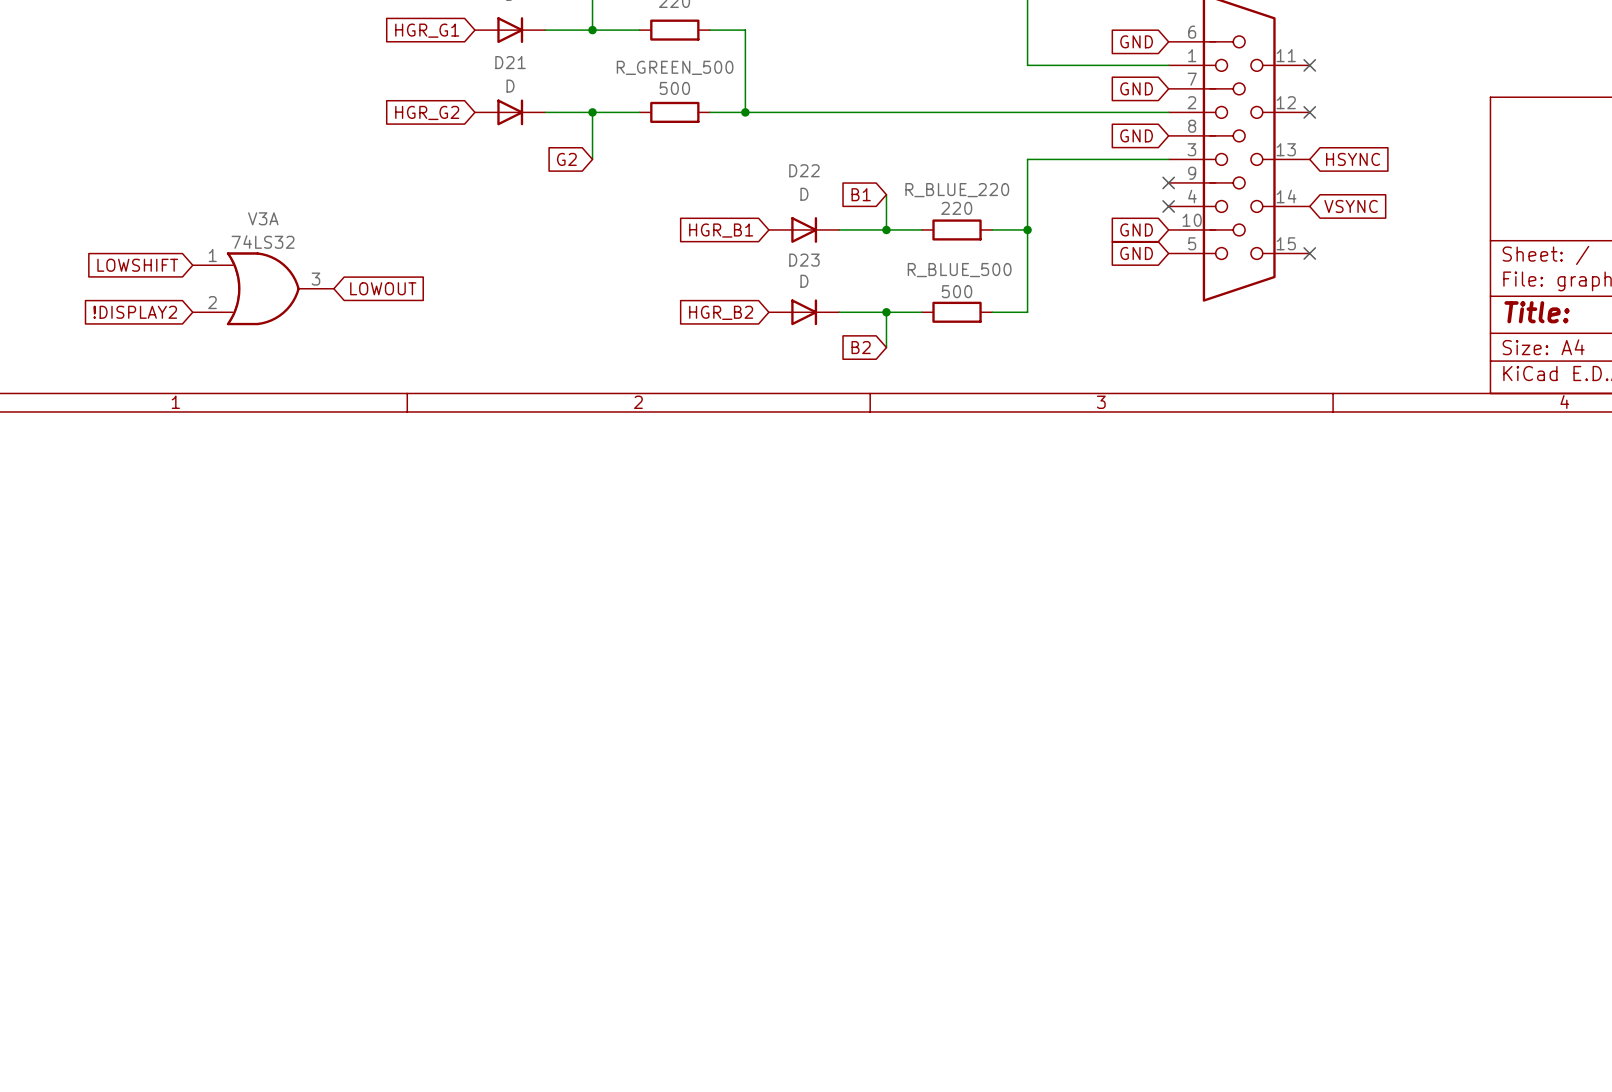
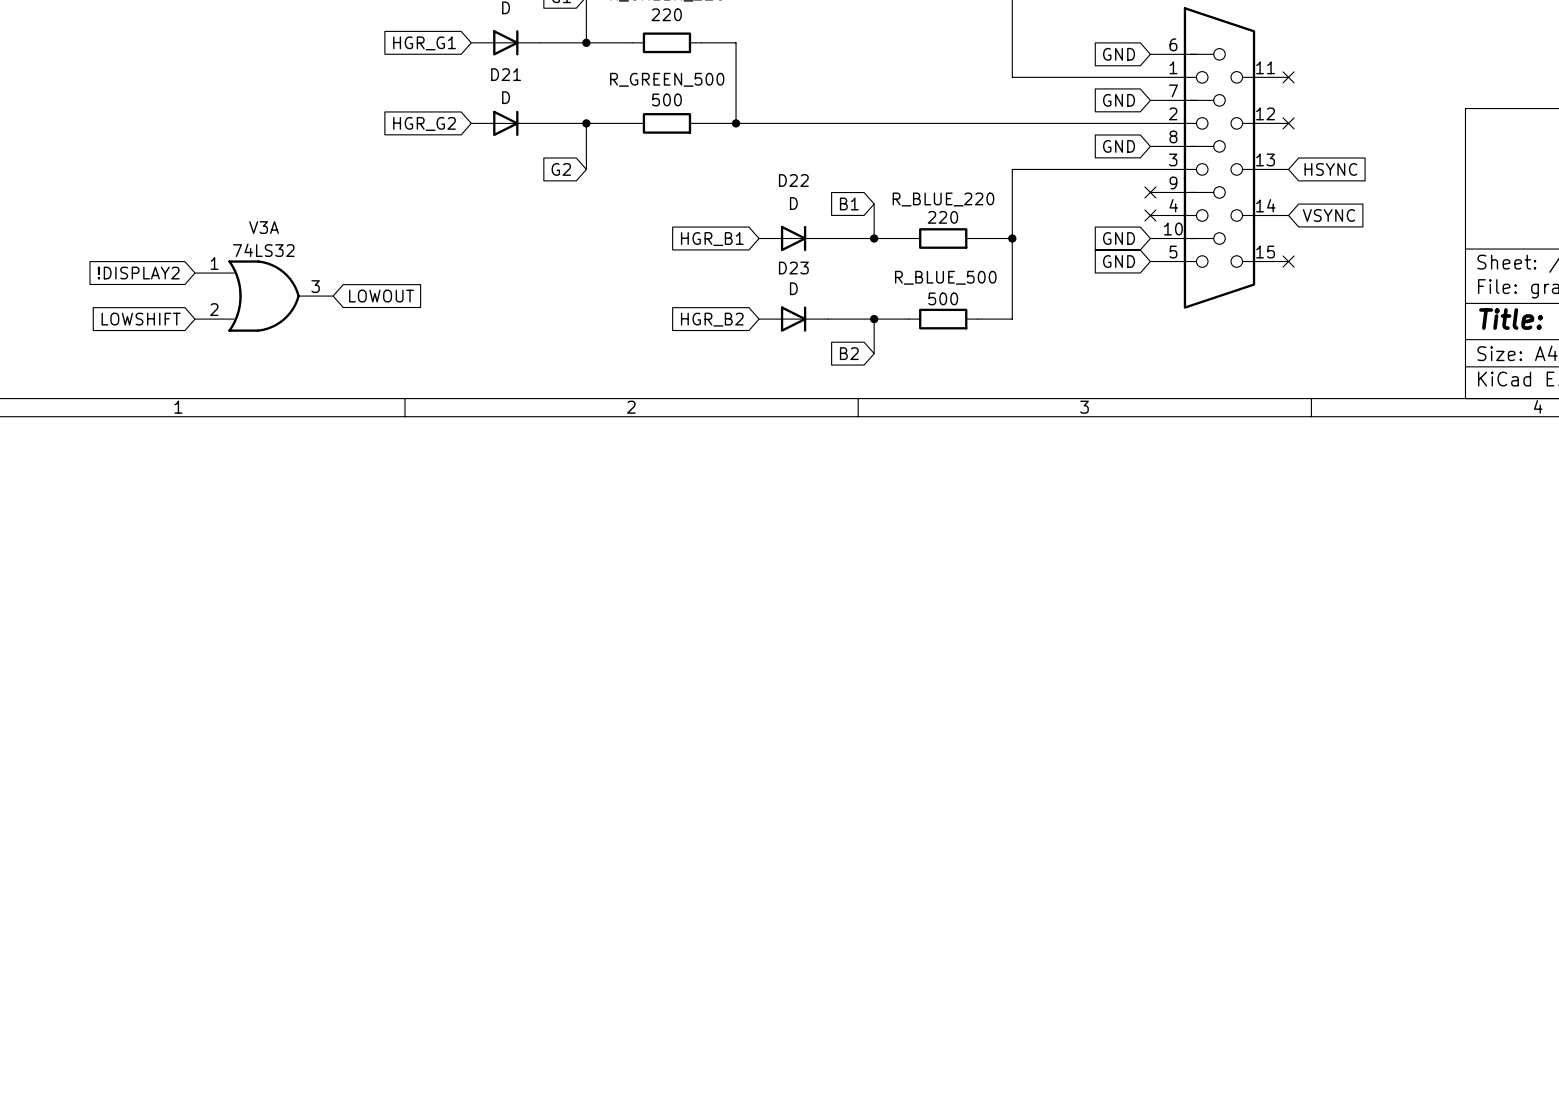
global label: LOWSHIFT (137, 265) -> !DISPLAY2 (138, 273)
global label: !DISPLAY2 (135, 312) -> LOWSHIFT (141, 319)

